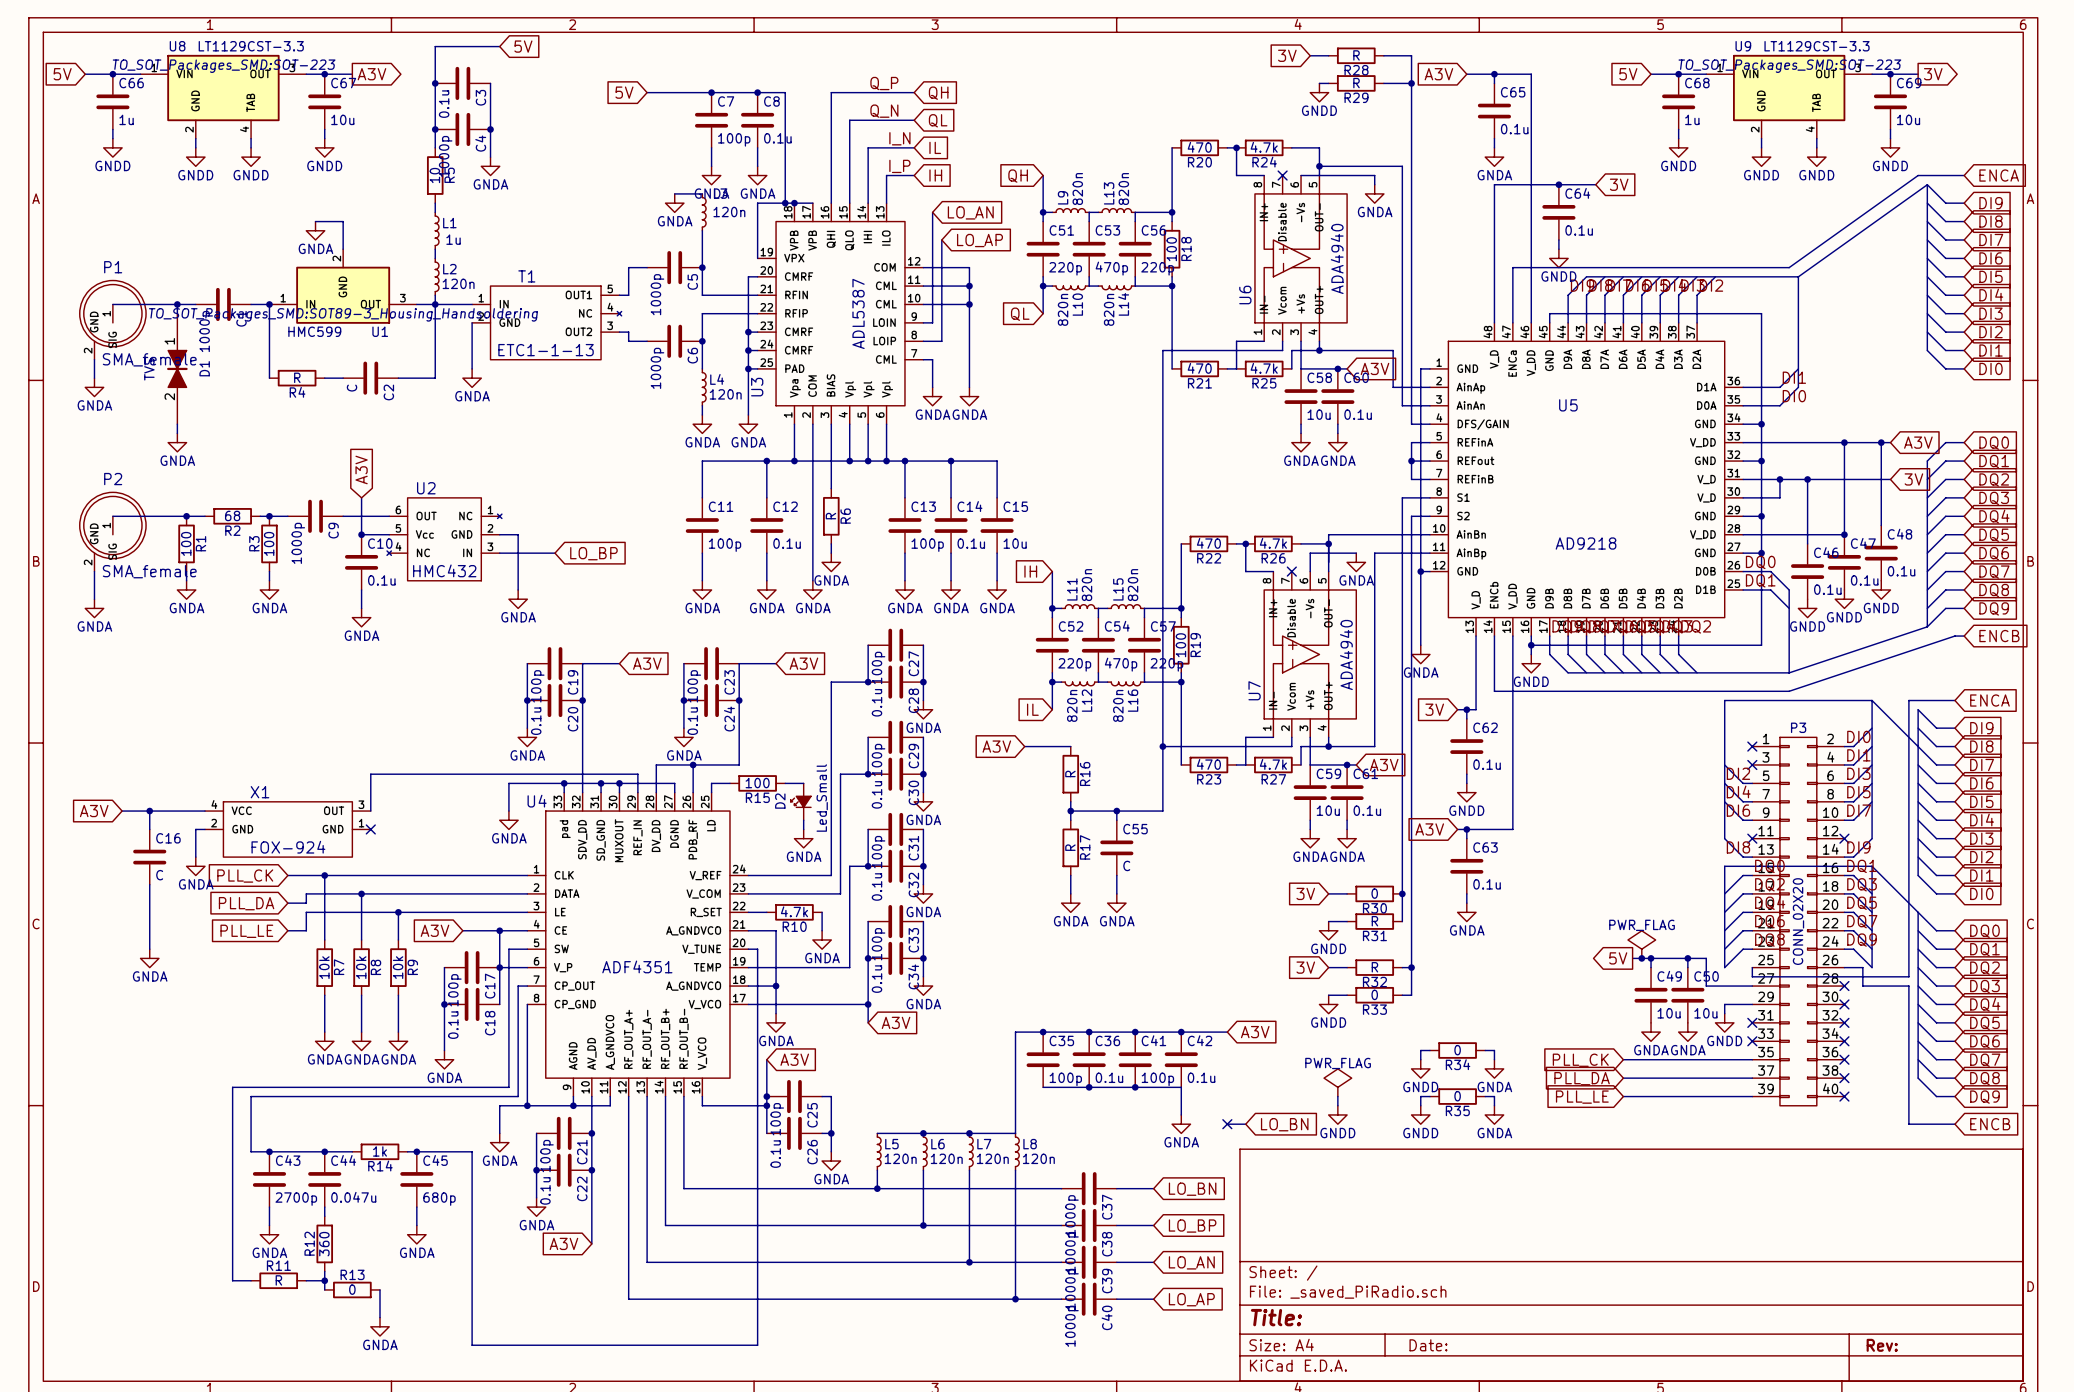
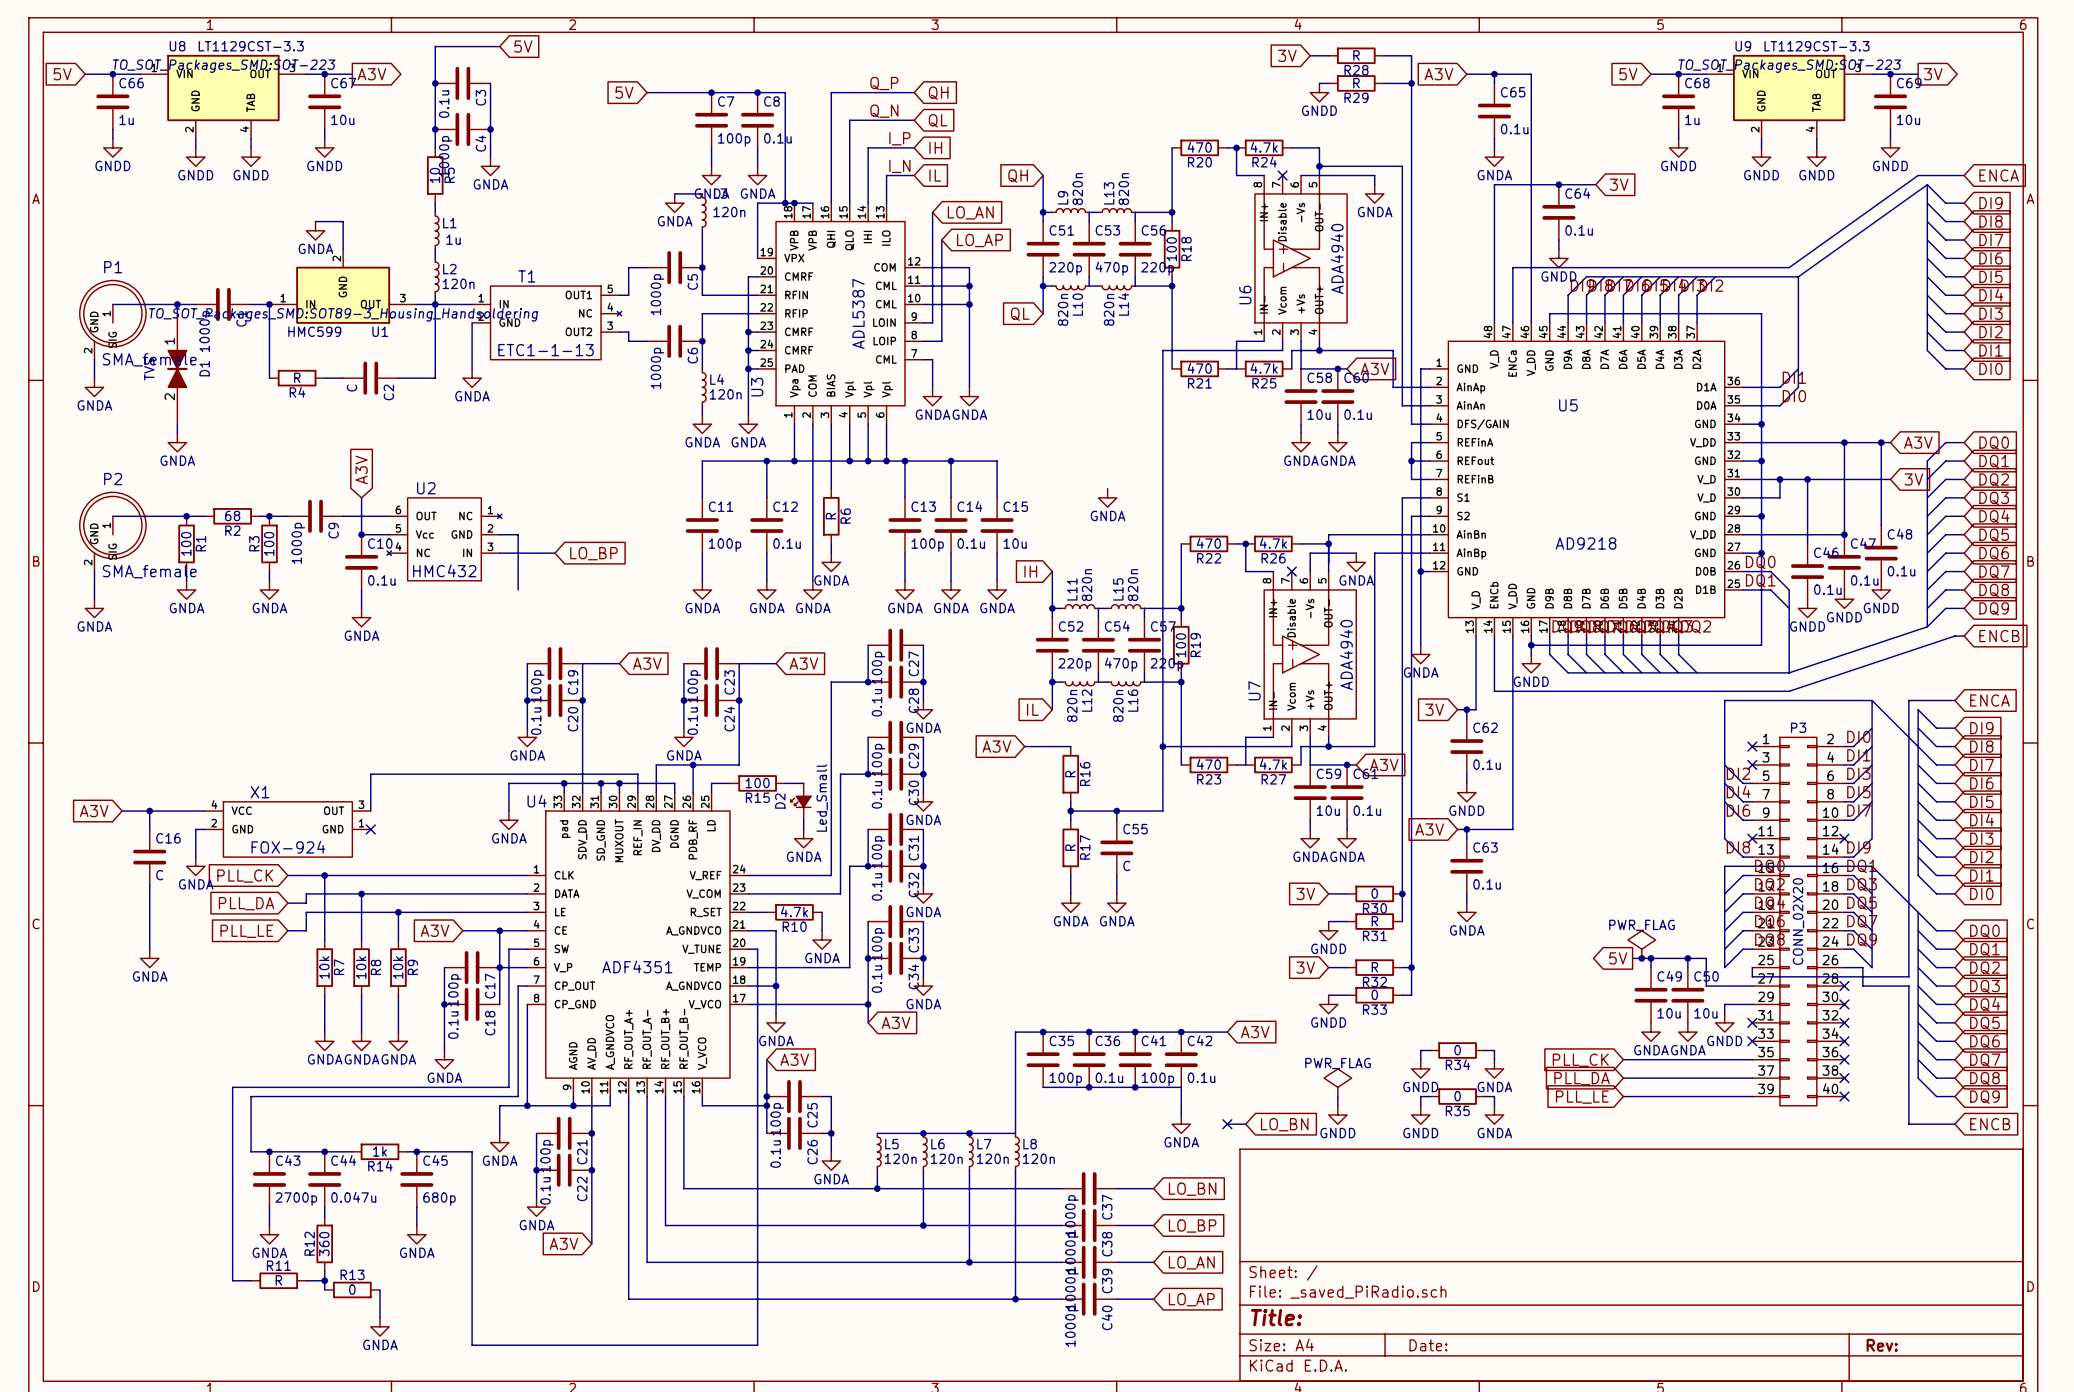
label: I_N (899, 138) -> I_P (899, 138)
global label: IL (935, 147) -> IH (935, 147)
label: I_P (899, 166) -> I_N (899, 166)
global label: IH (935, 175) -> IL (935, 175)
power symbol: none -> GNDA (1107, 497)
power symbol: GNDA (518, 599) -> none

